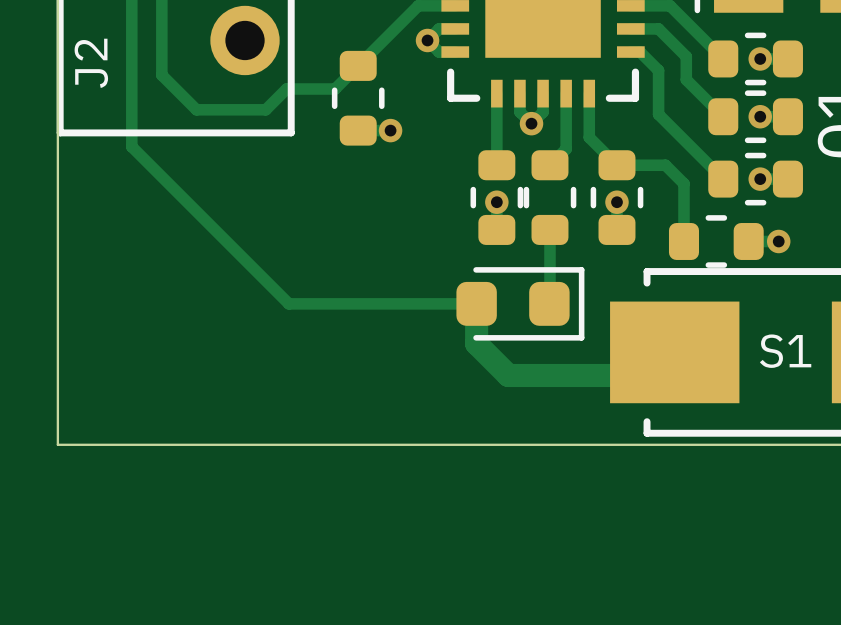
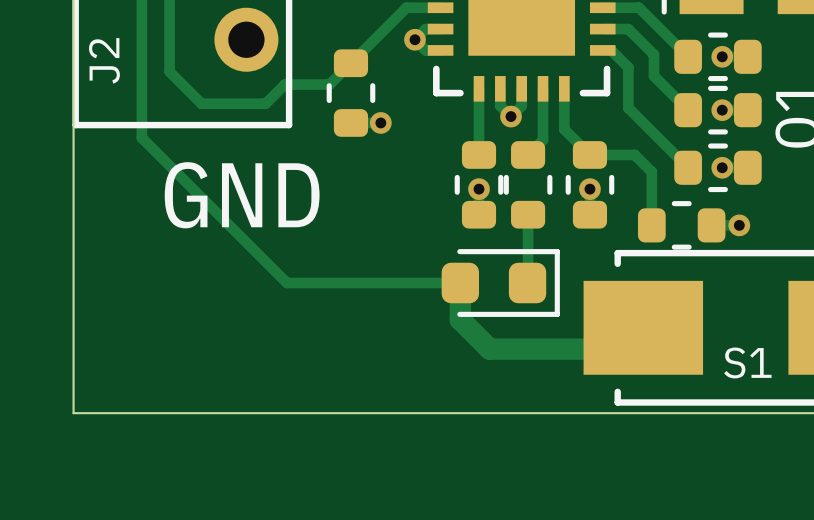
text: none -> GND (242, 195)
S1 name position: S1 (785, 351) -> S1 (747, 362)

